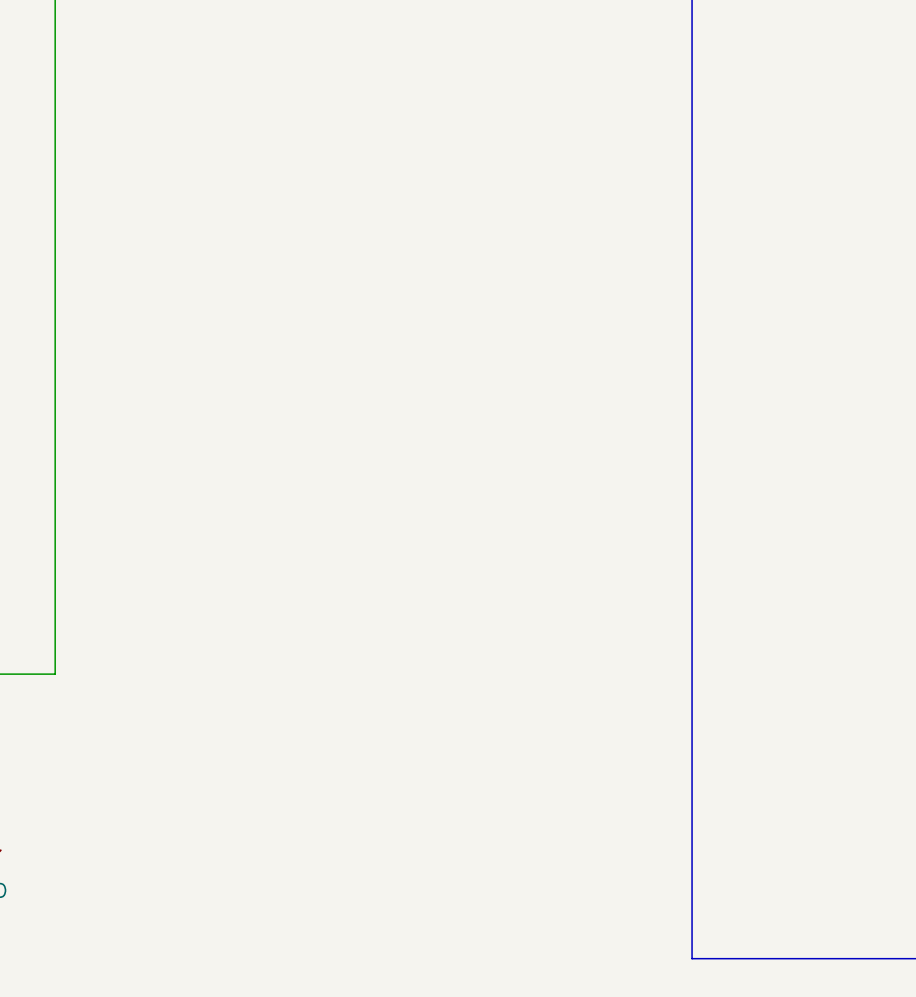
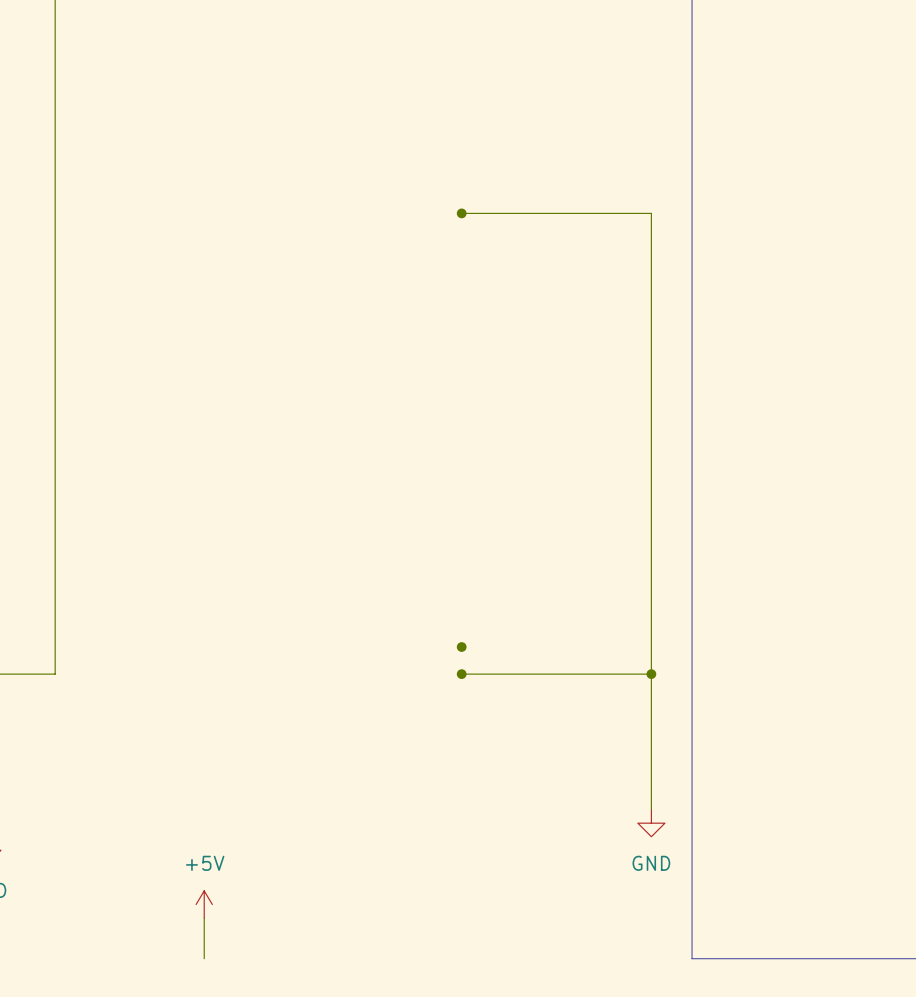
wire: none -> (461, 213) (651, 213) (651, 809)
junction: none -> (461, 213)
junction: none -> (461, 647)
wire: none -> (461, 674) (651, 674)
junction: none -> (461, 674)
junction: none -> (651, 674)
power symbol: none -> GND (651, 823)
power symbol: none -> +5V (204, 904)
wire: none -> (204, 918) (204, 958)

